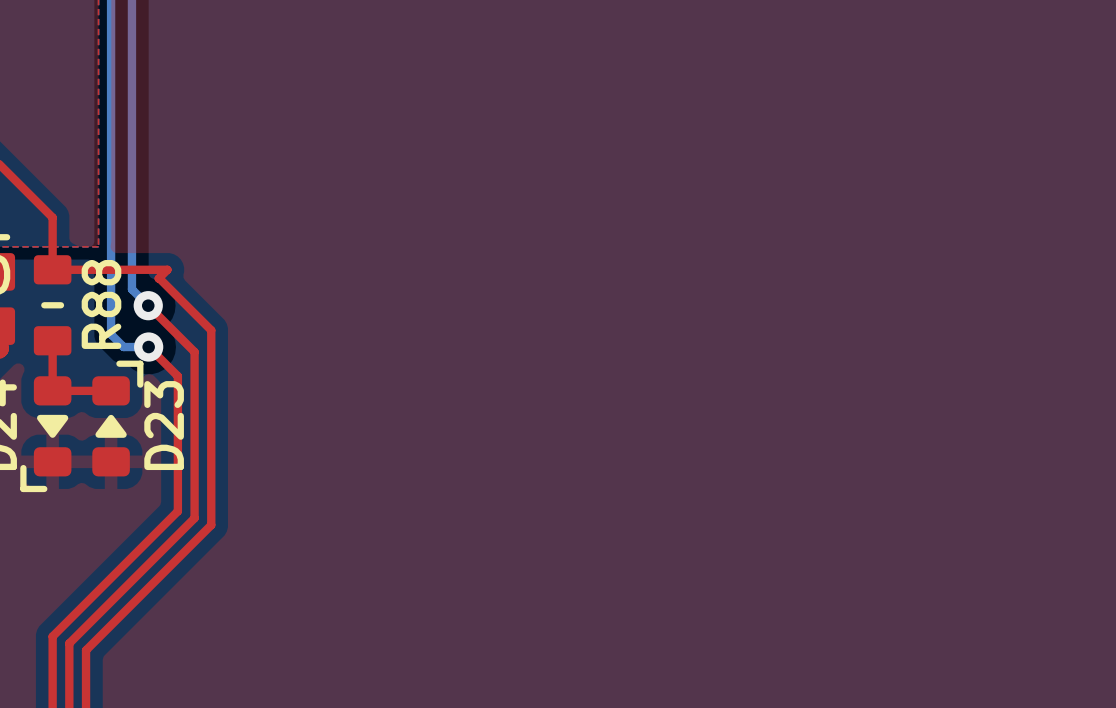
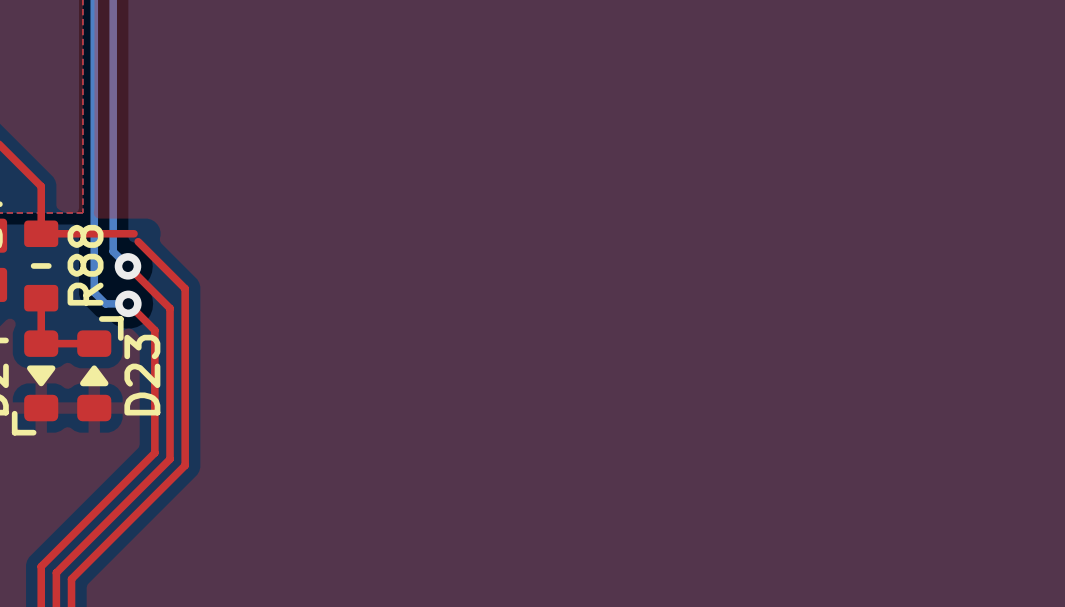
top track: (154, 269) (167, 269) (158, 278) -> none

